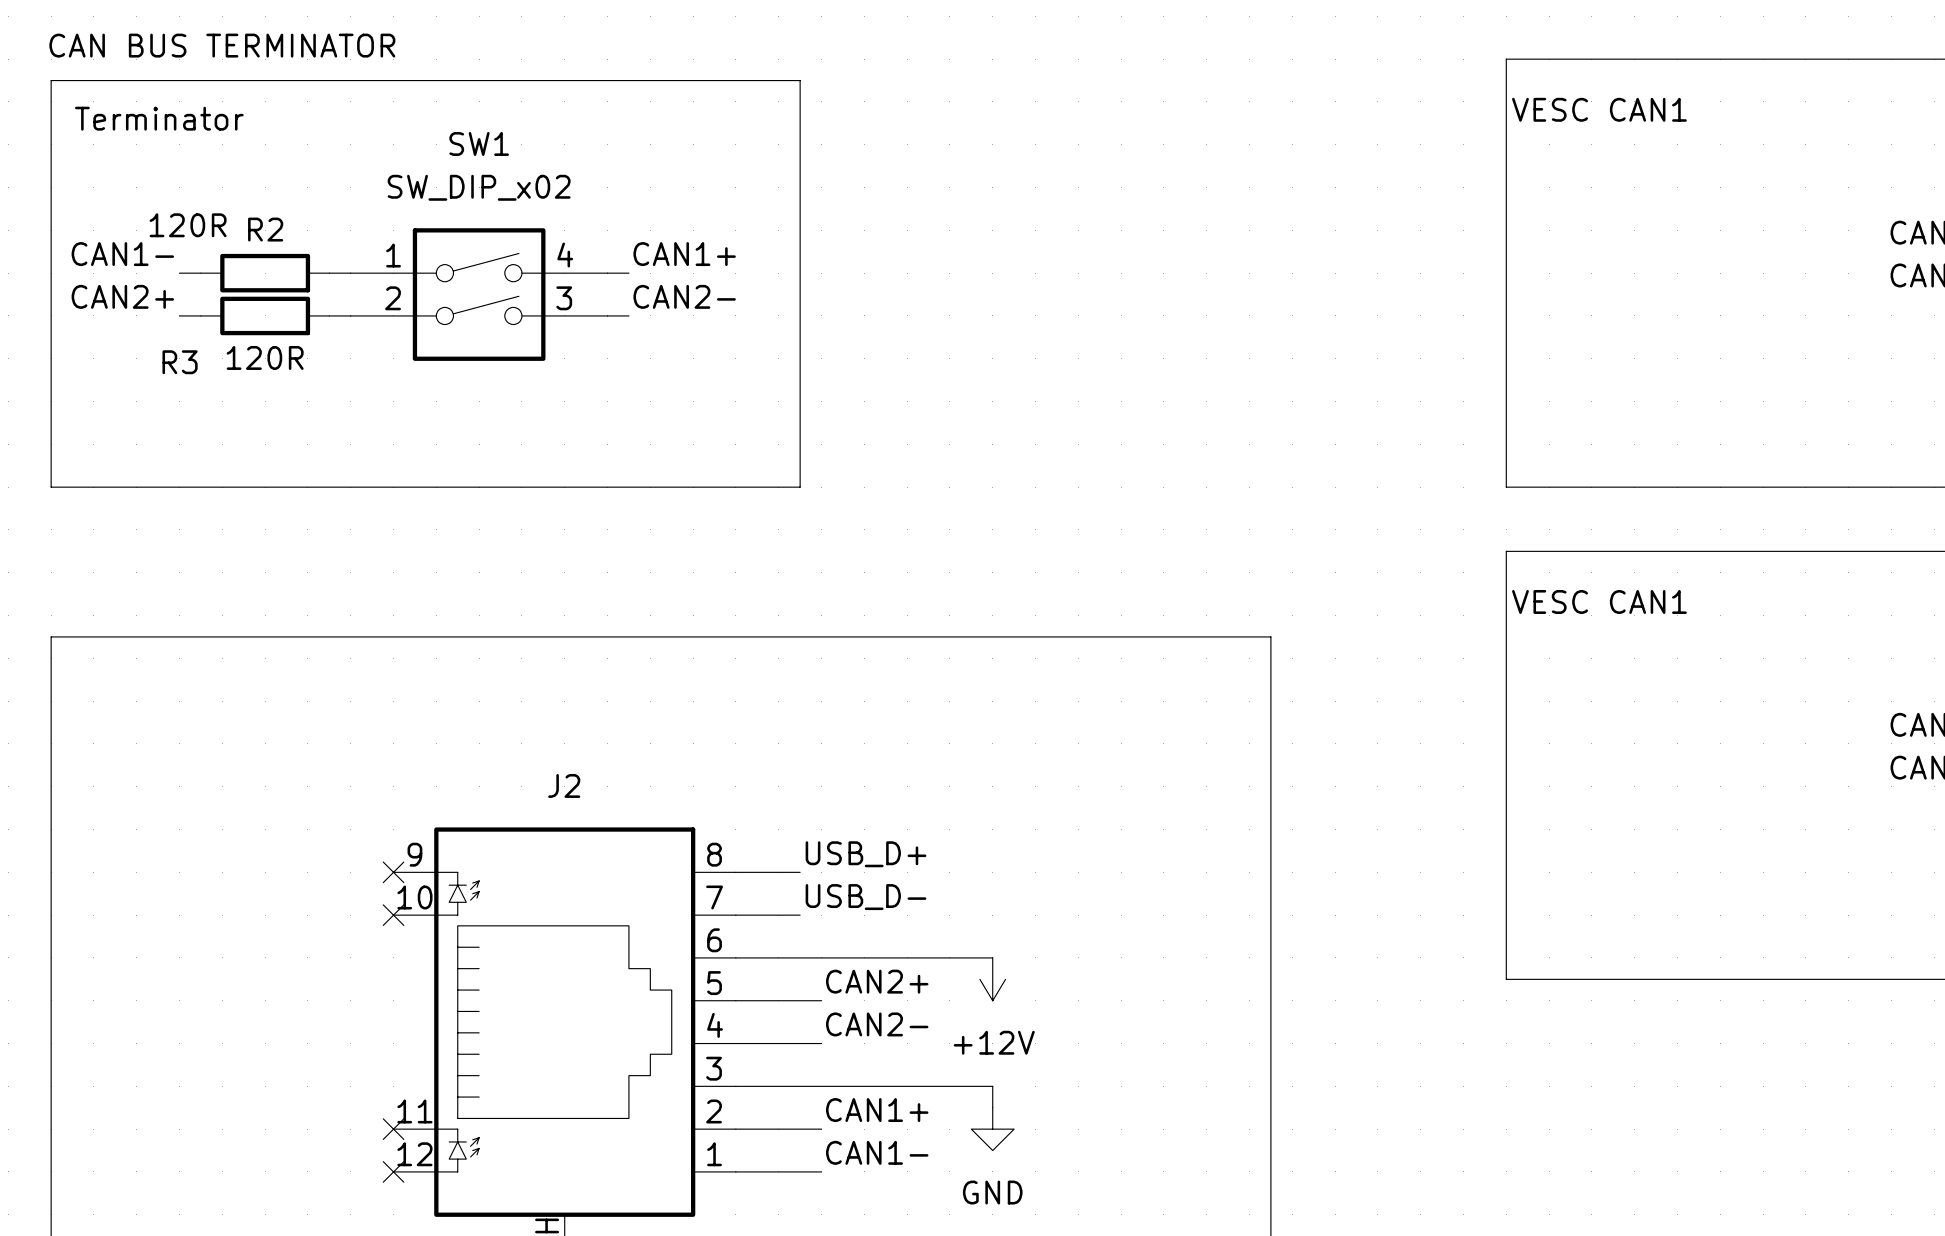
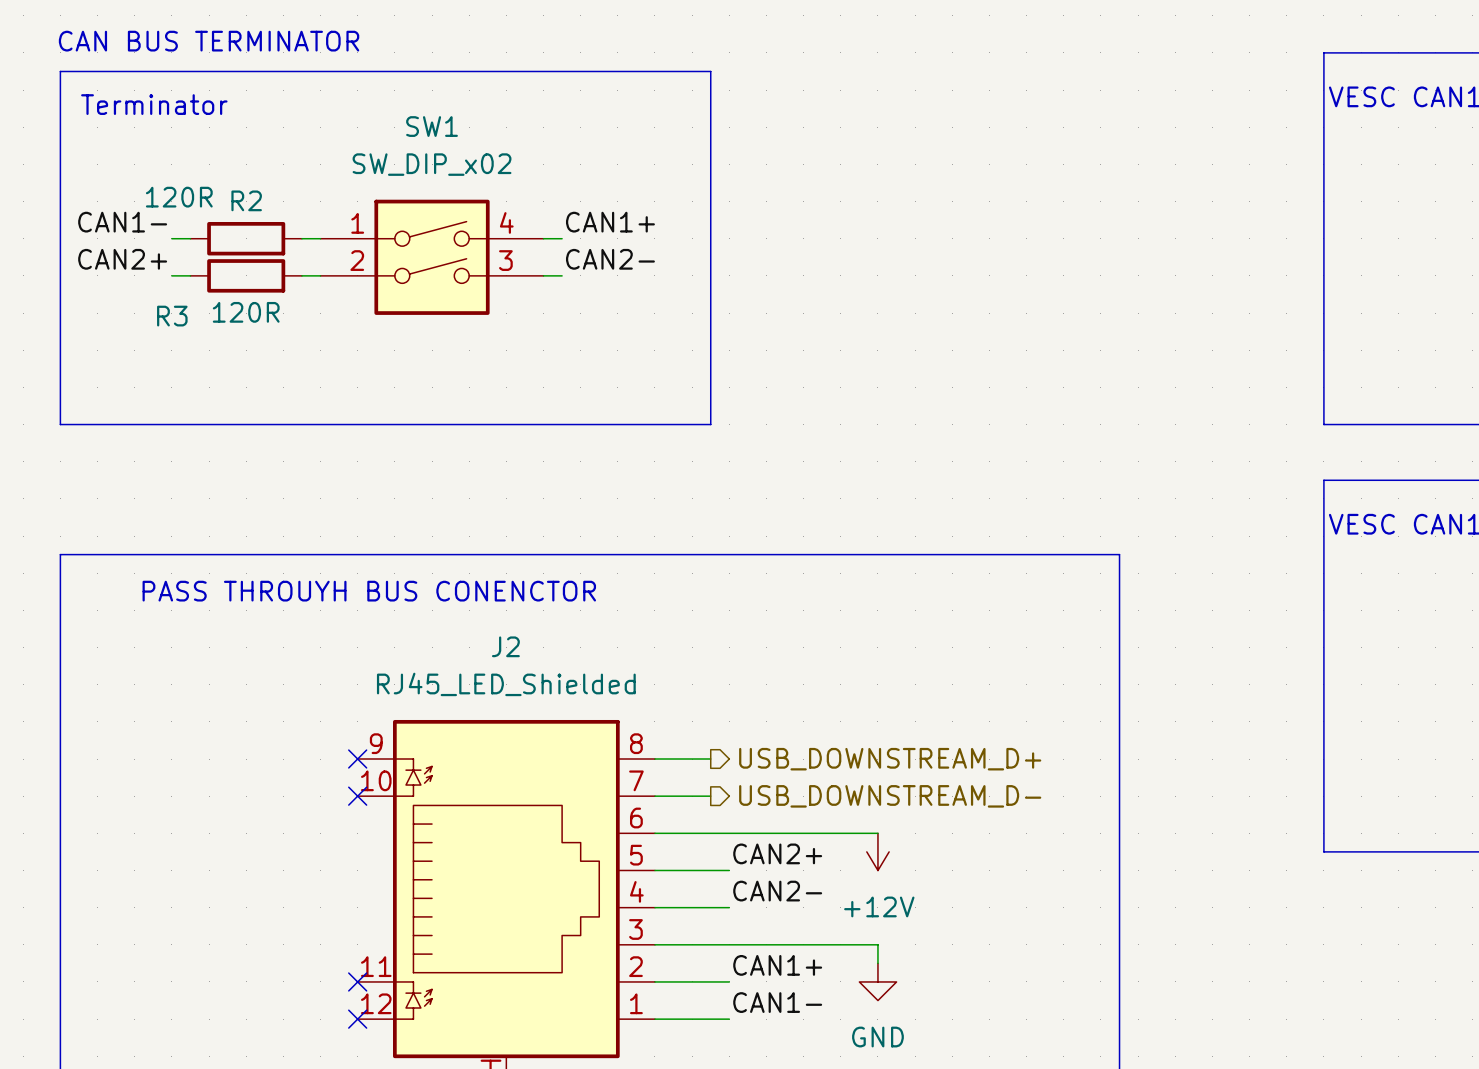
text: none -> PASS THROUYH BUS CONENCTOR (369, 591)
J2 name position: J2 (564, 785) -> J2 (505, 646)
J2 value: none -> RJ45_LED_Shielded (506, 684)
label: USB_D+ (866, 854) -> none
hierarchical label: none -> USB_DOWNSTREAM_D+ (890, 759)
label: USB_D- (866, 897) -> none
hierarchical label: none -> USB_DOWNSTREAM_D- (890, 796)

